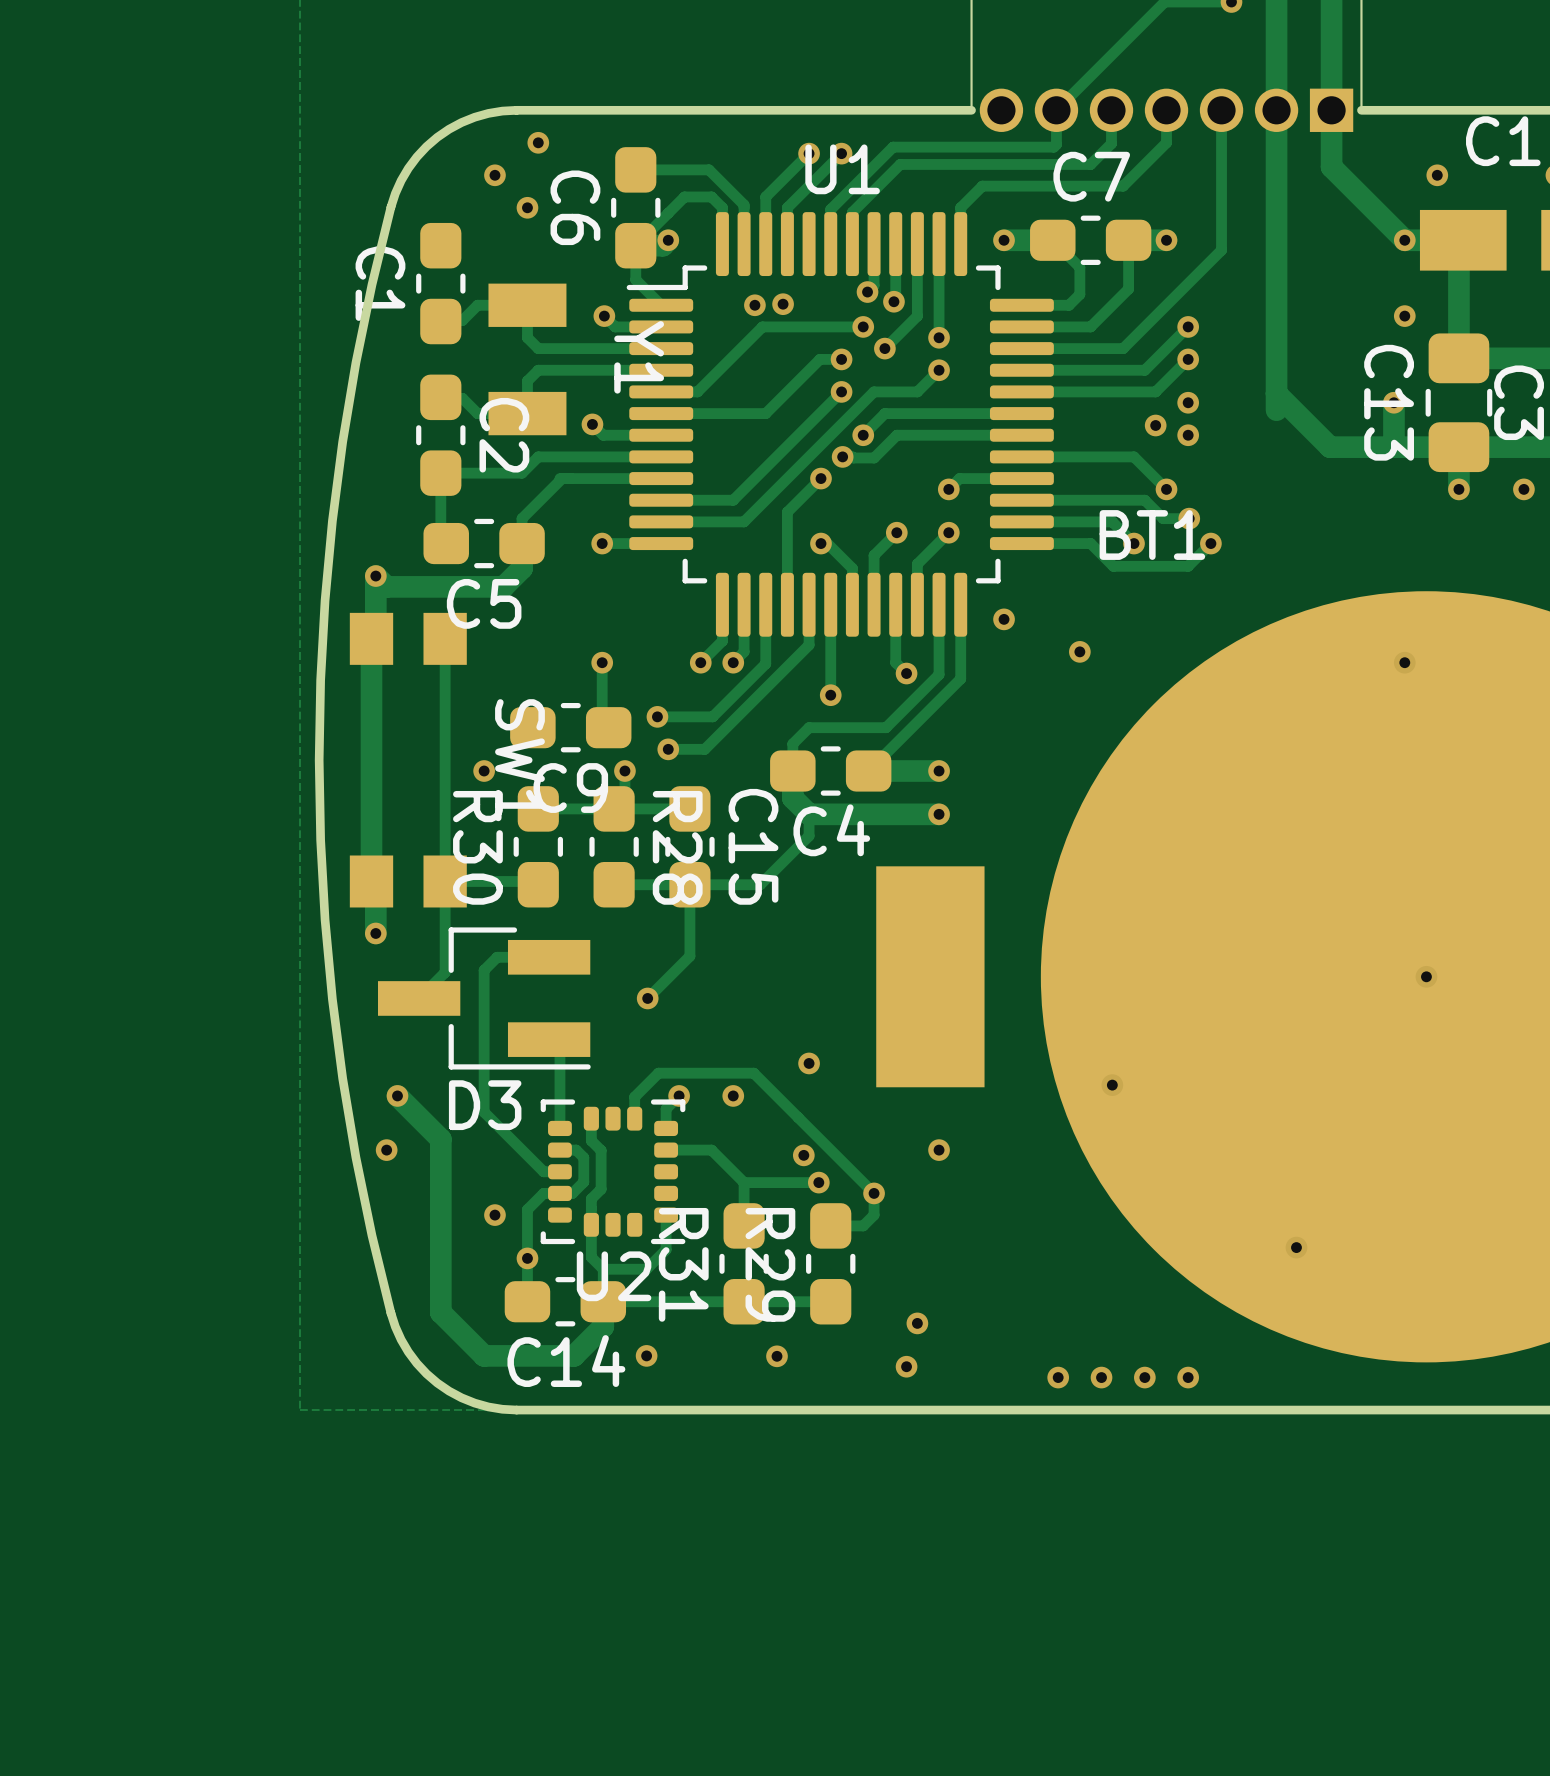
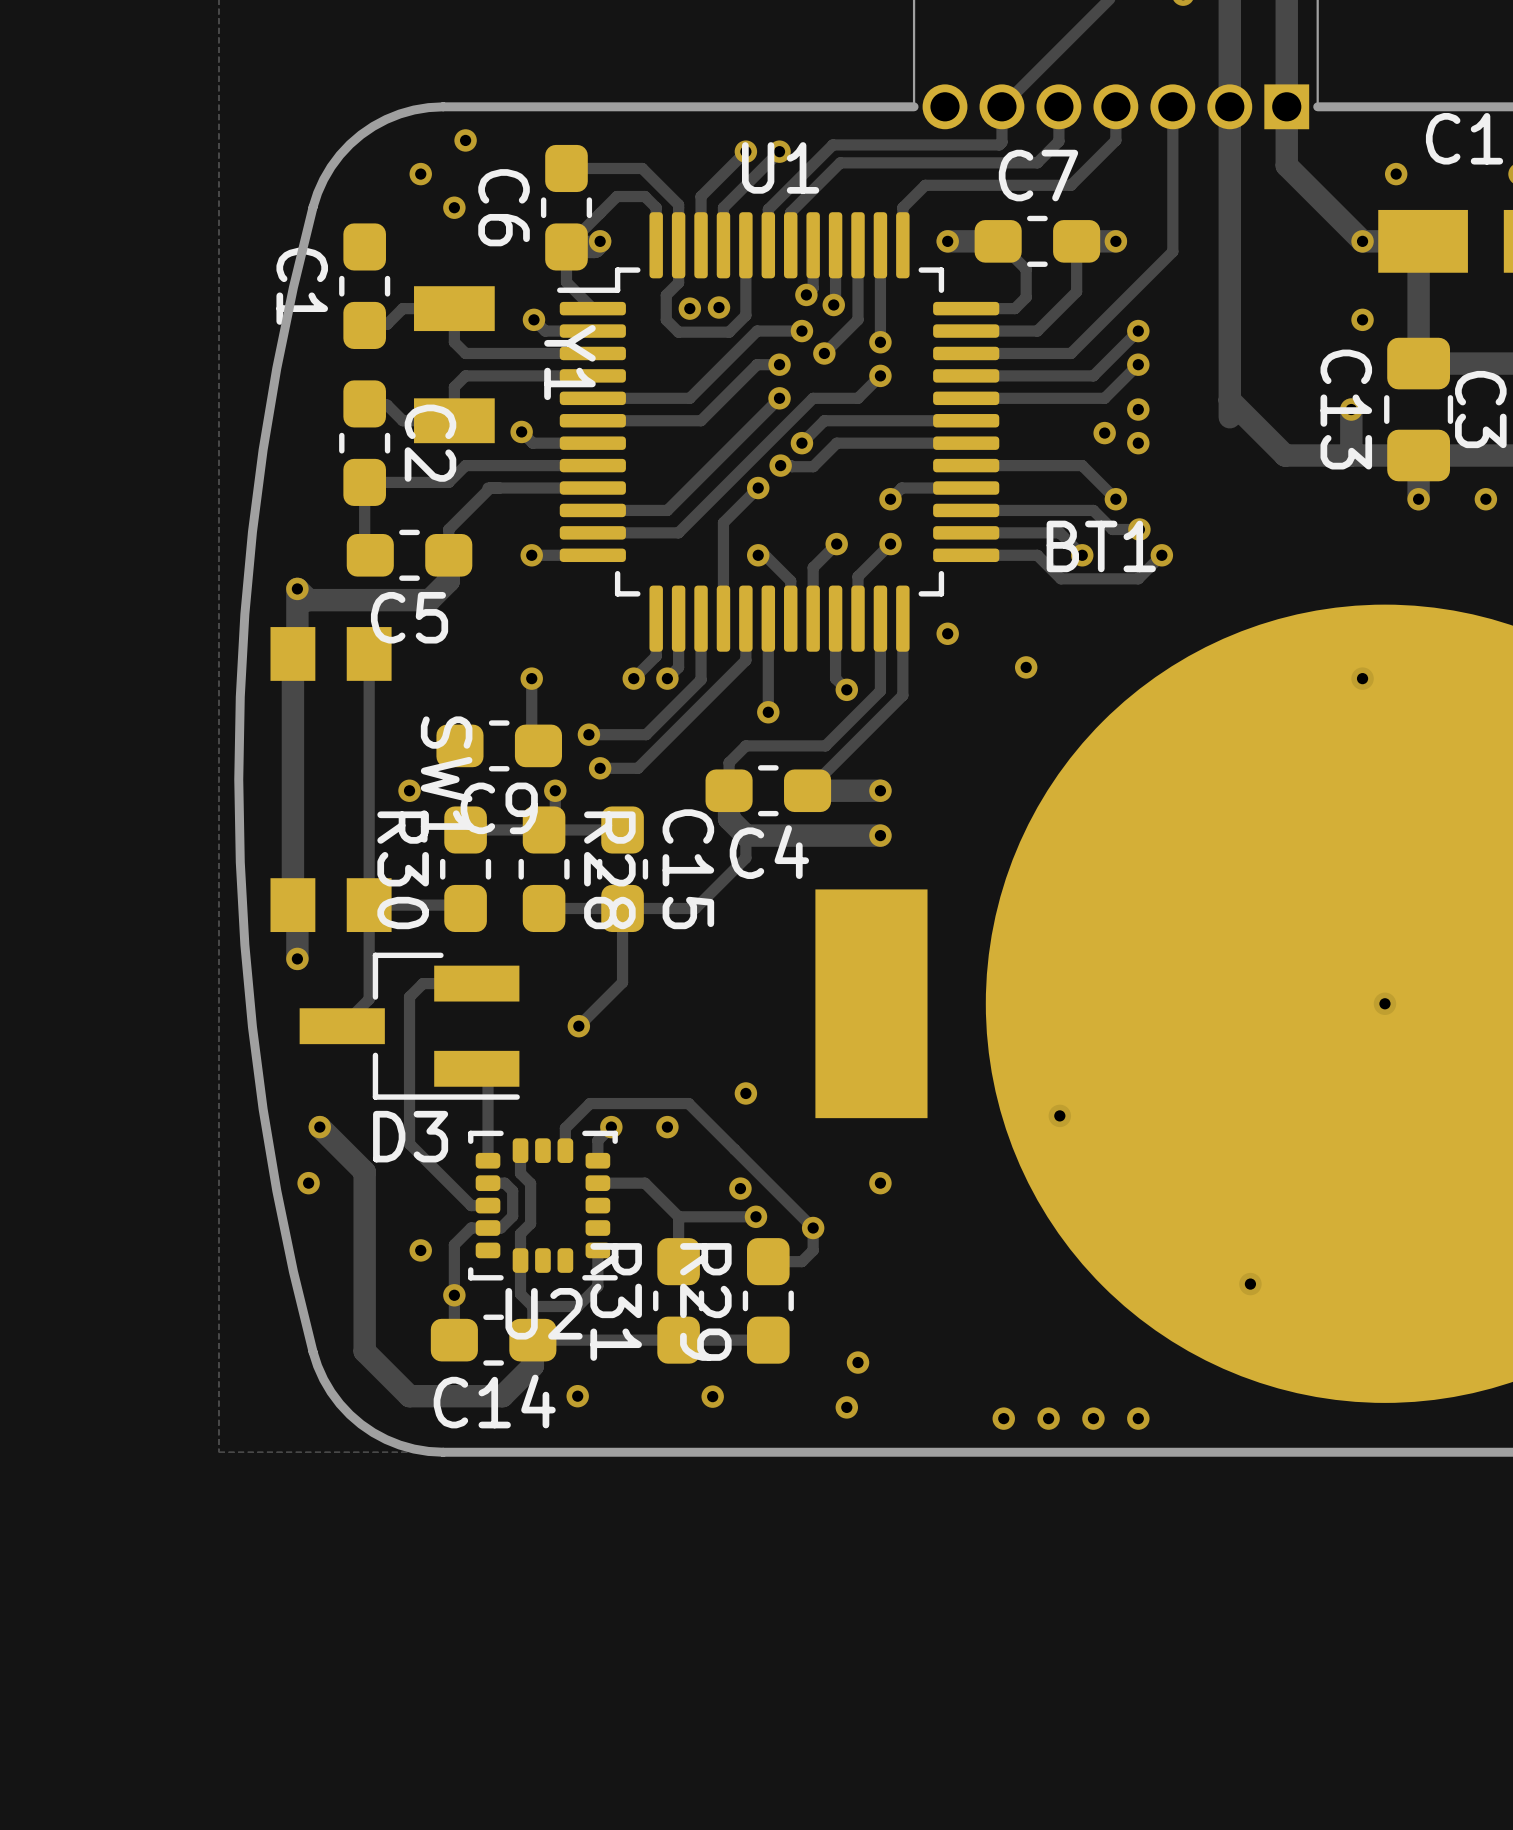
track: none -> (745, 245) (745, 315) (729, 332) (678, 332) (666, 319) (666, 295) (678, 282) (678, 245)
track: (819, 326) (762, 326) (697, 391) -> (757, 331) (689, 398) (630, 398)

